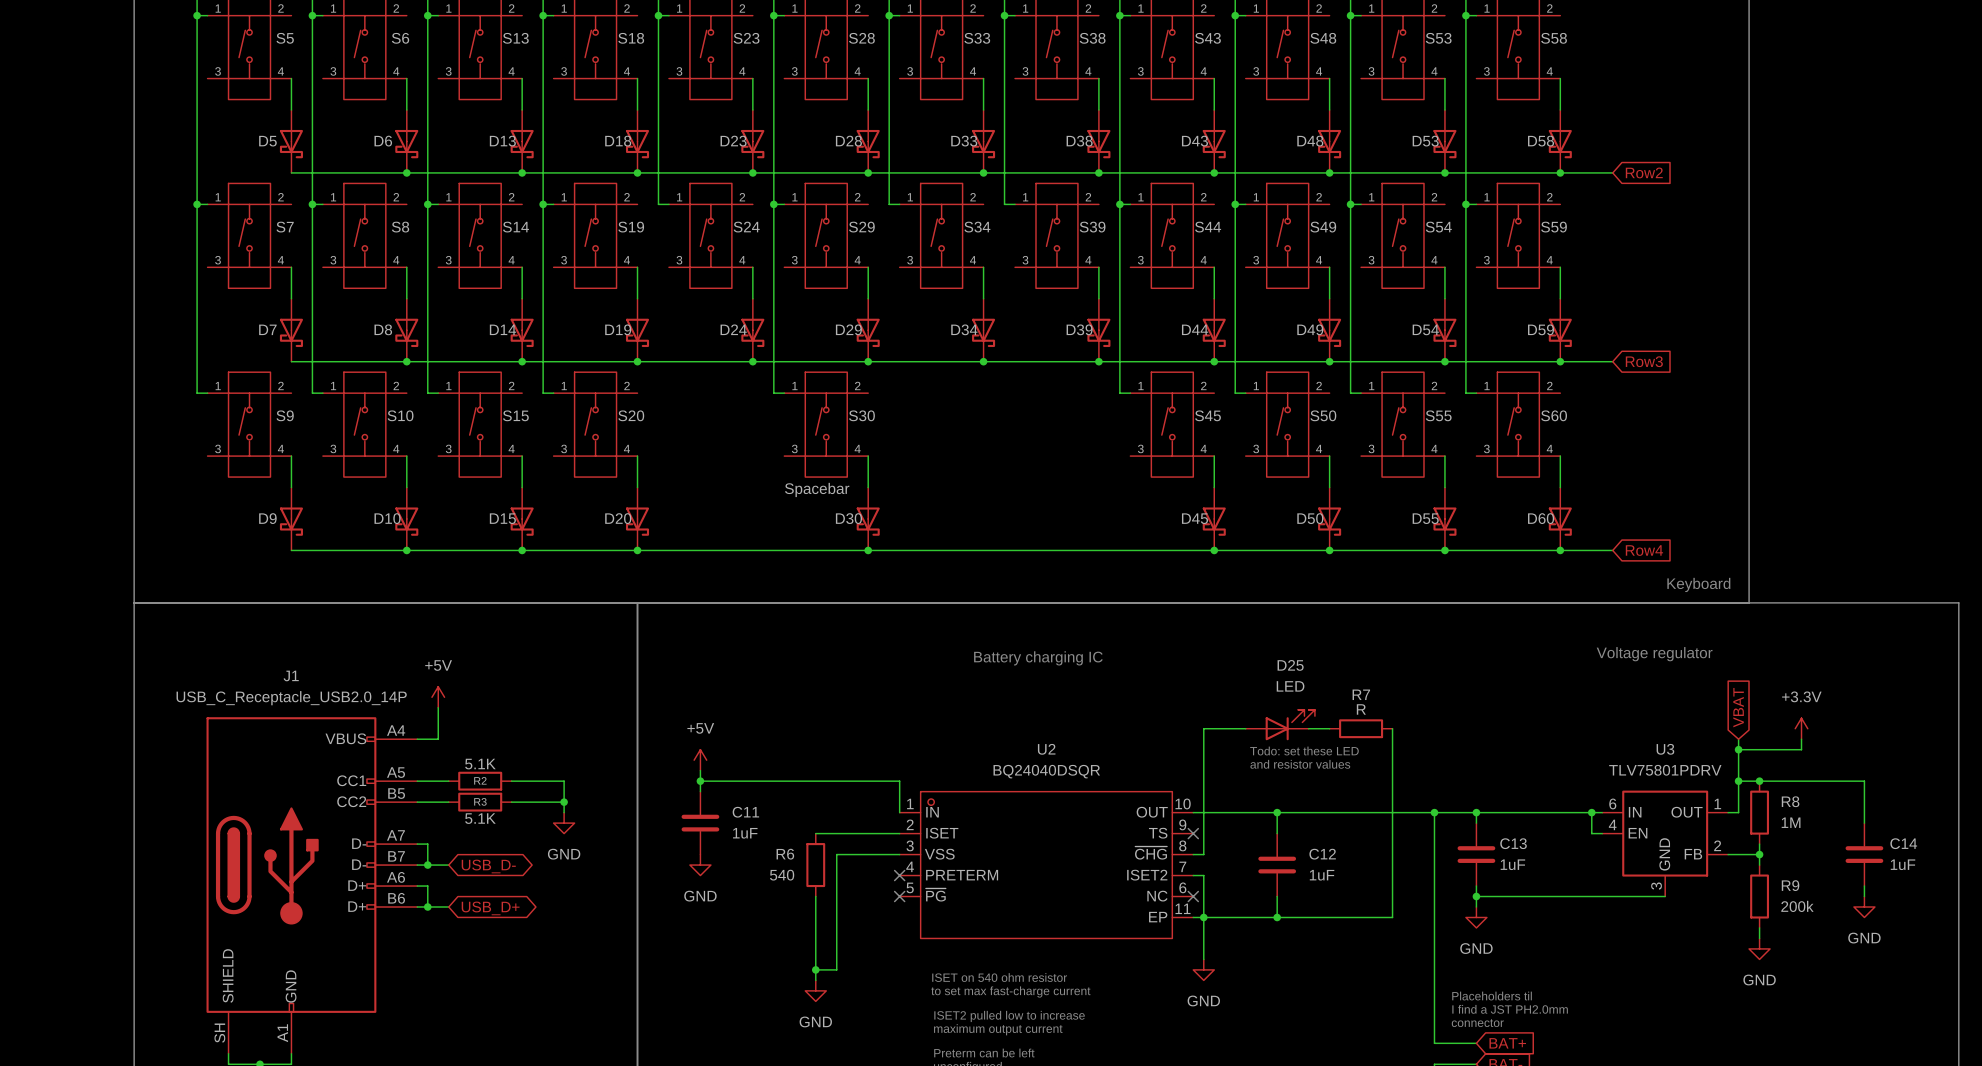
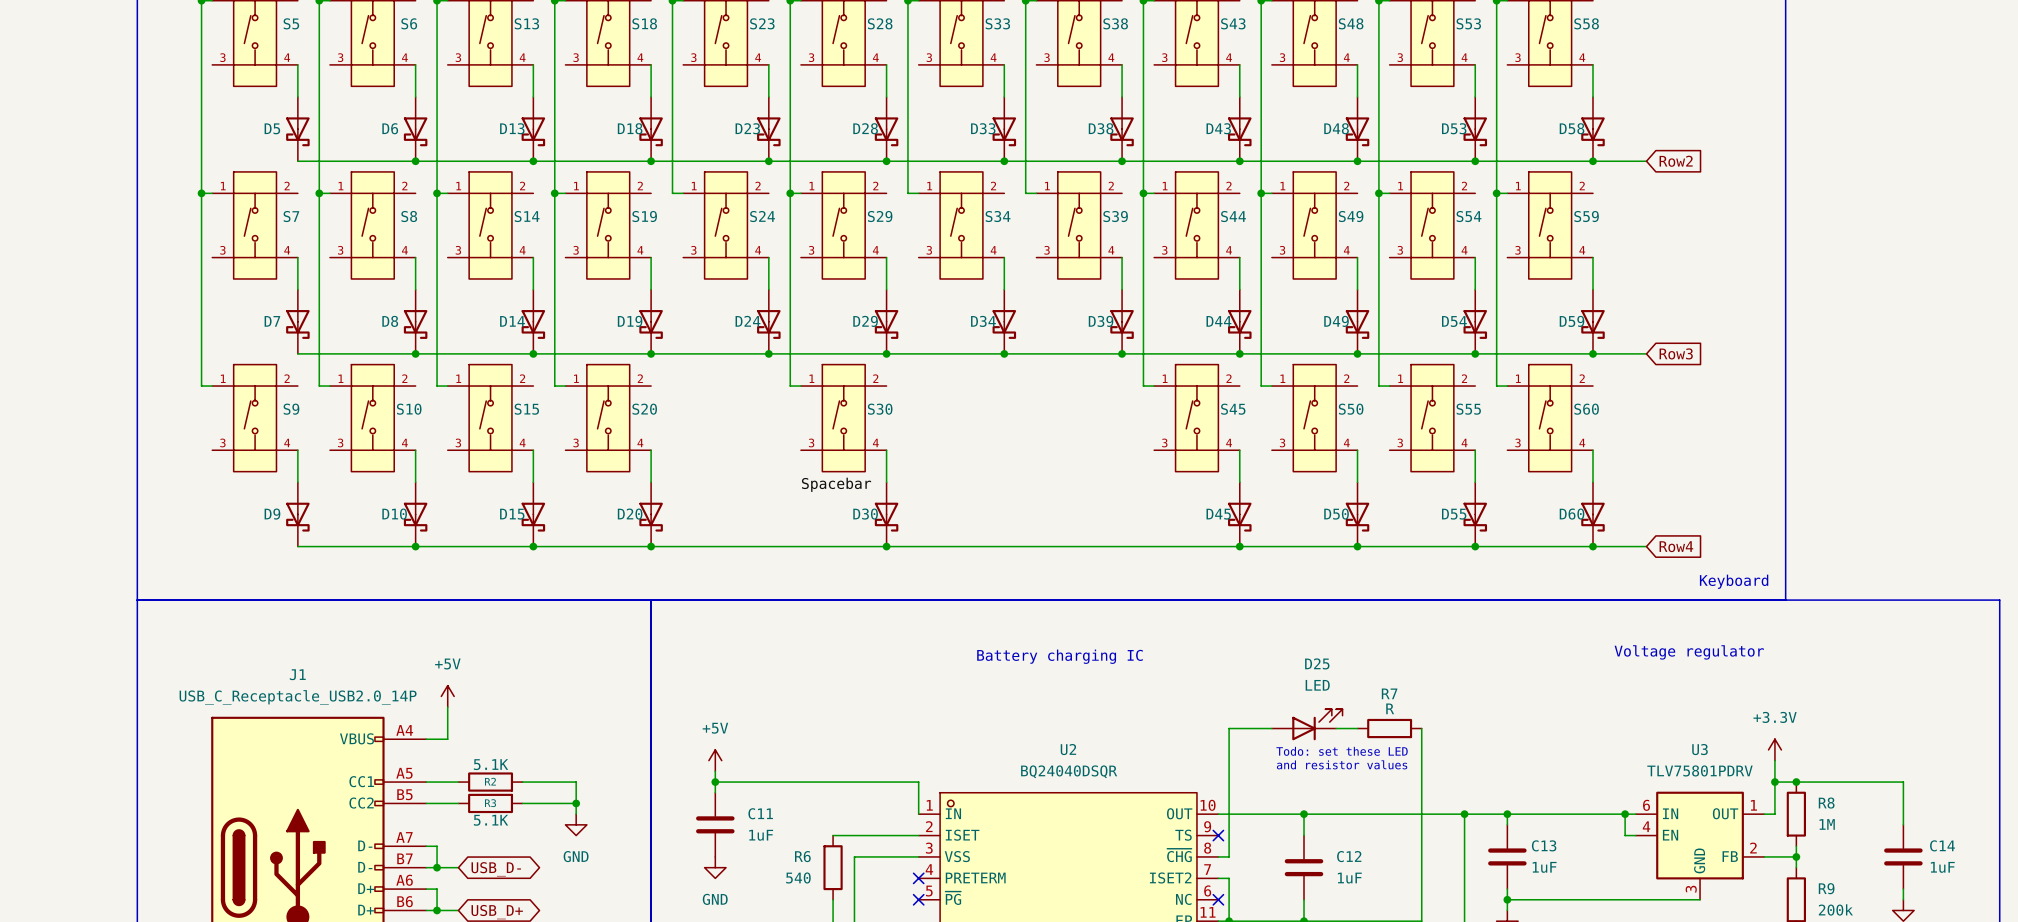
global label: VBAT (1738, 707) -> none
power symbol position: +3.3V (1801, 728) -> +3.3V (1774, 749)
wire: (1801, 739) (1801, 749) (1738, 749) -> none
junction: (1738, 749) -> none

